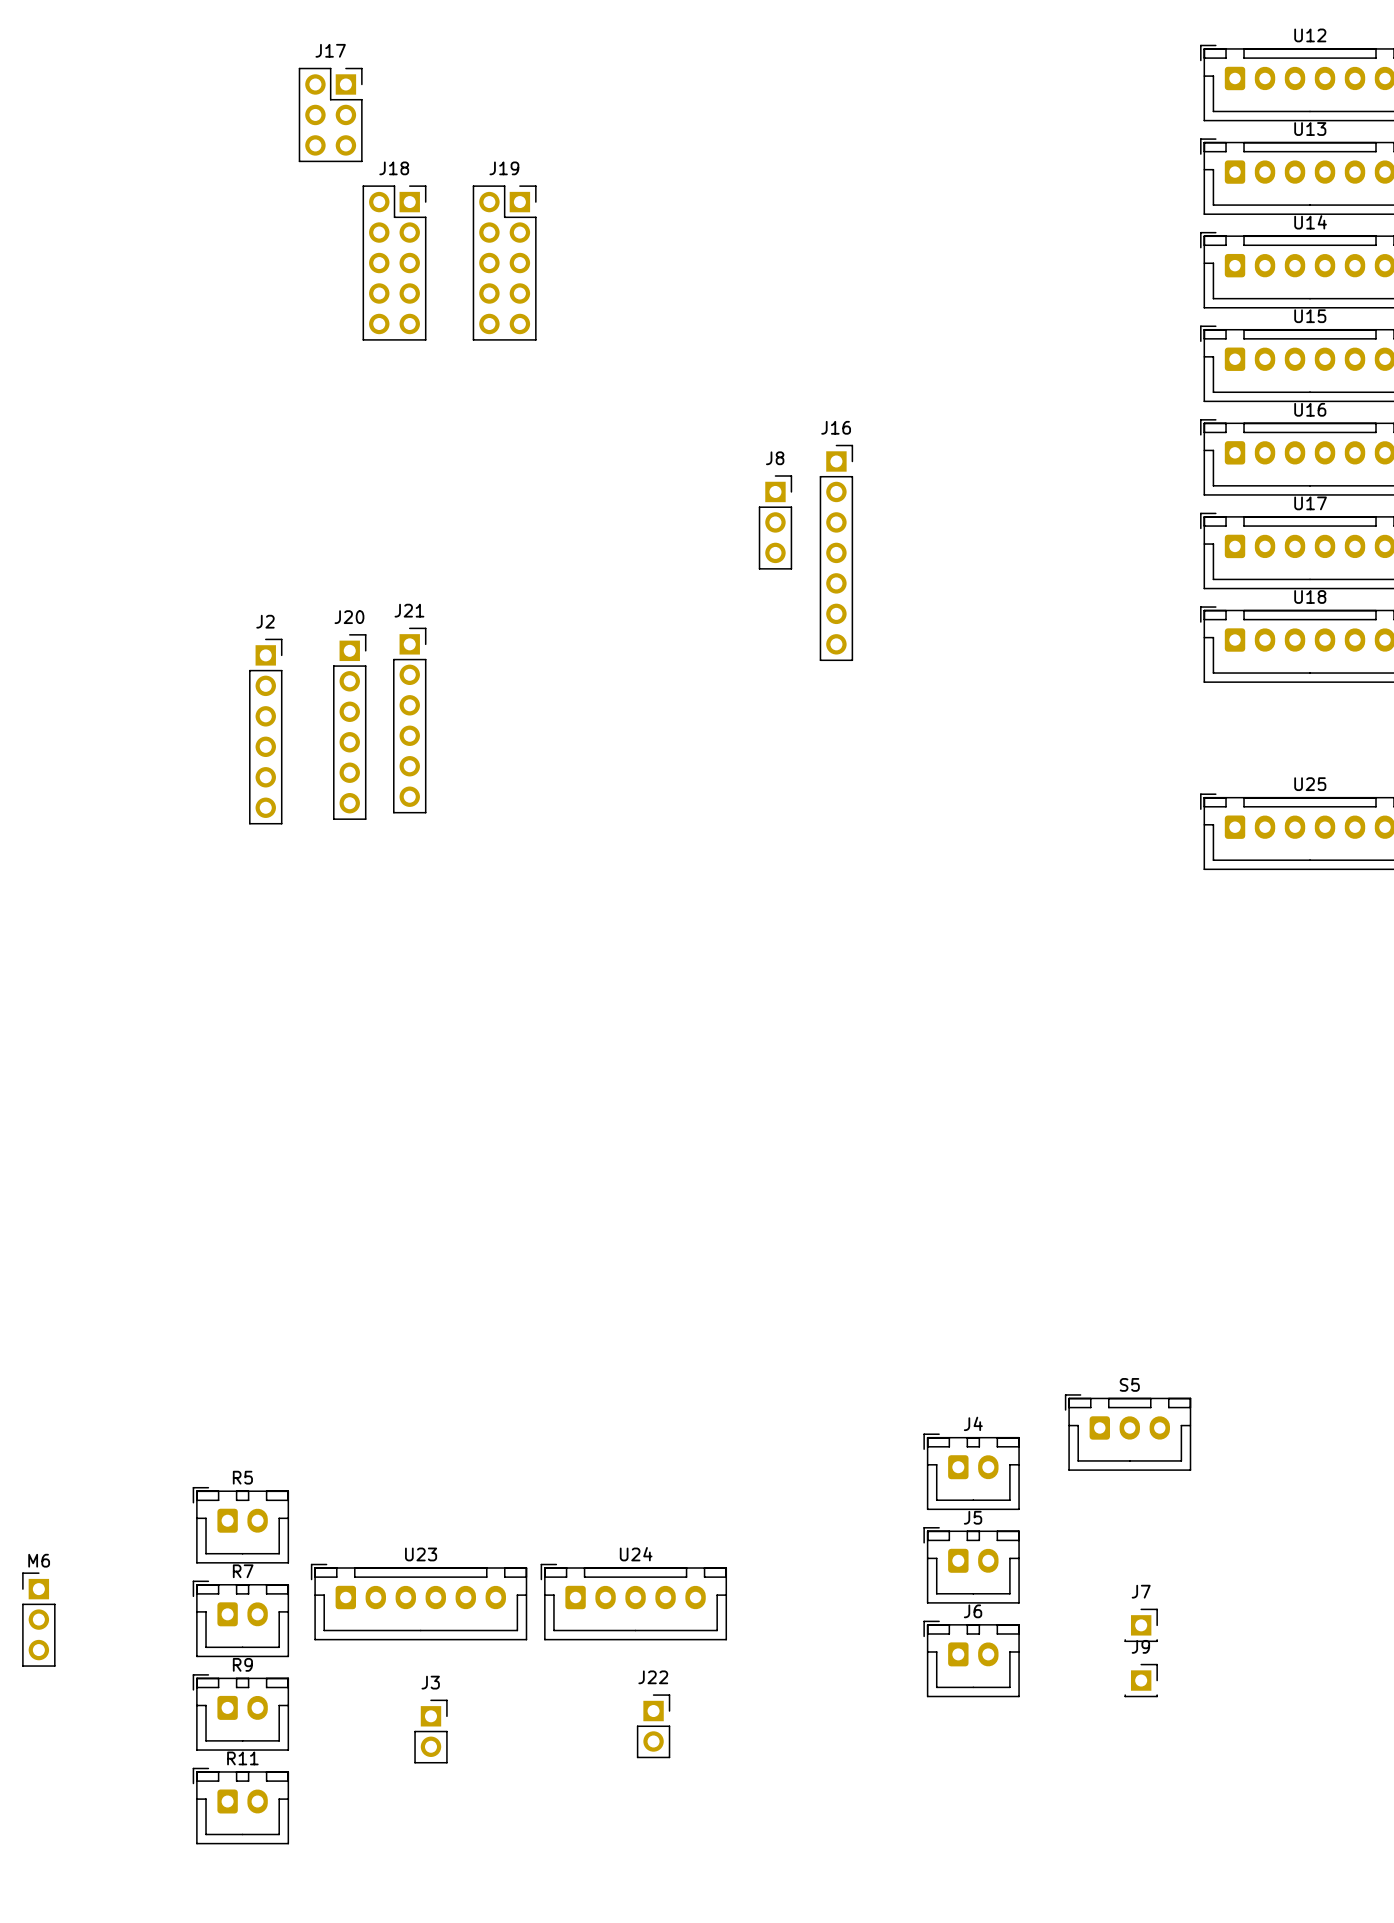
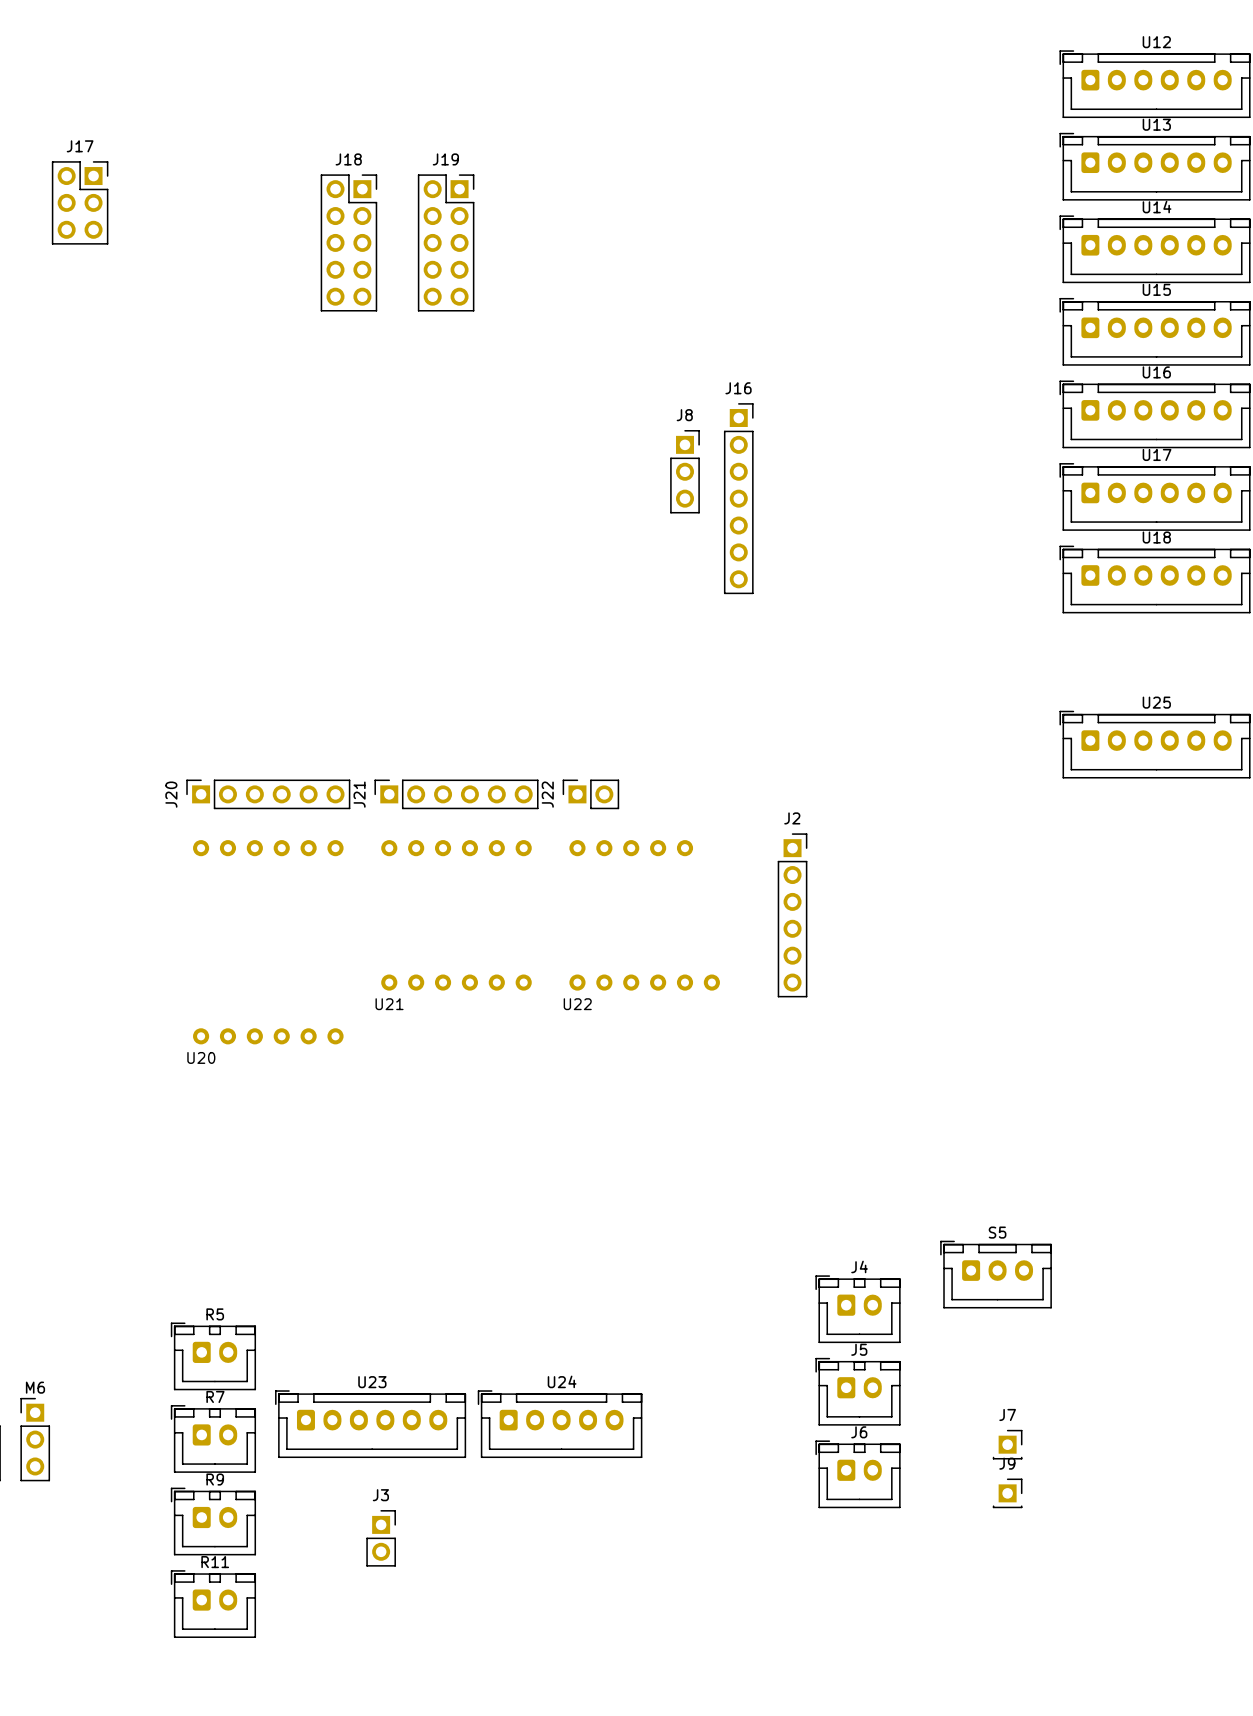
J17 position: (330, 114) -> (80, 202)
J21 rotation: 0° (409, 720) -> 90° counterclockwise (456, 794)
J21 position: (409, 720) -> (456, 794)
J20 rotation: 0° (349, 727) -> 90° counterclockwise (268, 794)
J20 position: (349, 727) -> (268, 794)
J2 position: (265, 731) -> (792, 915)
U21: none -> (456, 915)
U22: none -> (644, 915)
U20: none -> (268, 942)
J22 rotation: 0° (653, 1726) -> 90° counterclockwise (590, 794)
J22 position: (653, 1726) -> (590, 794)

